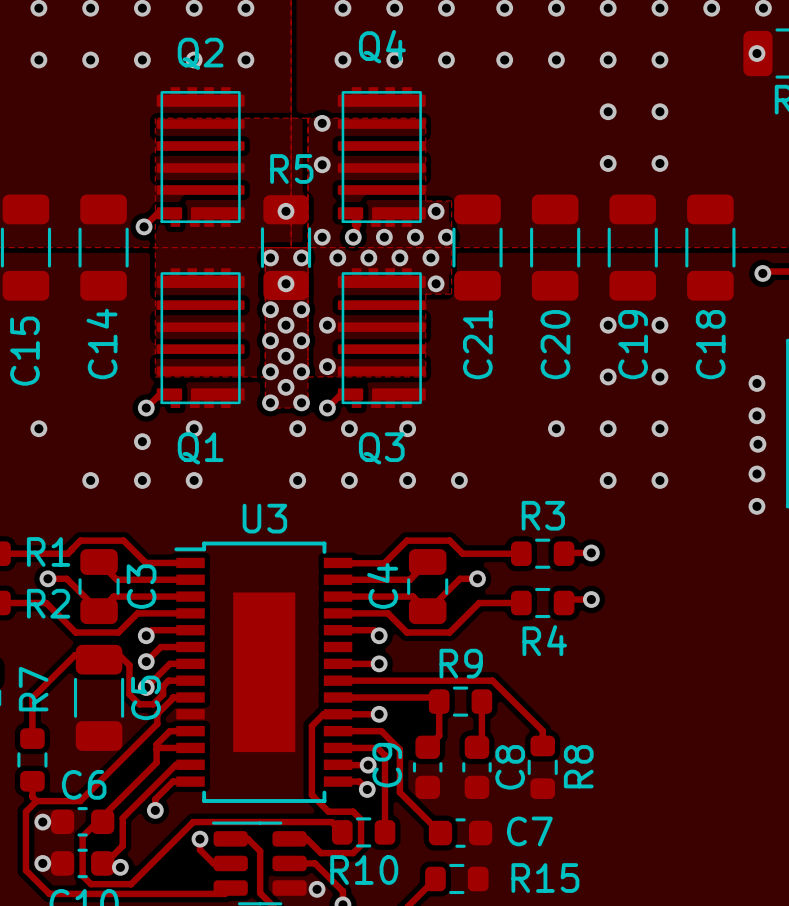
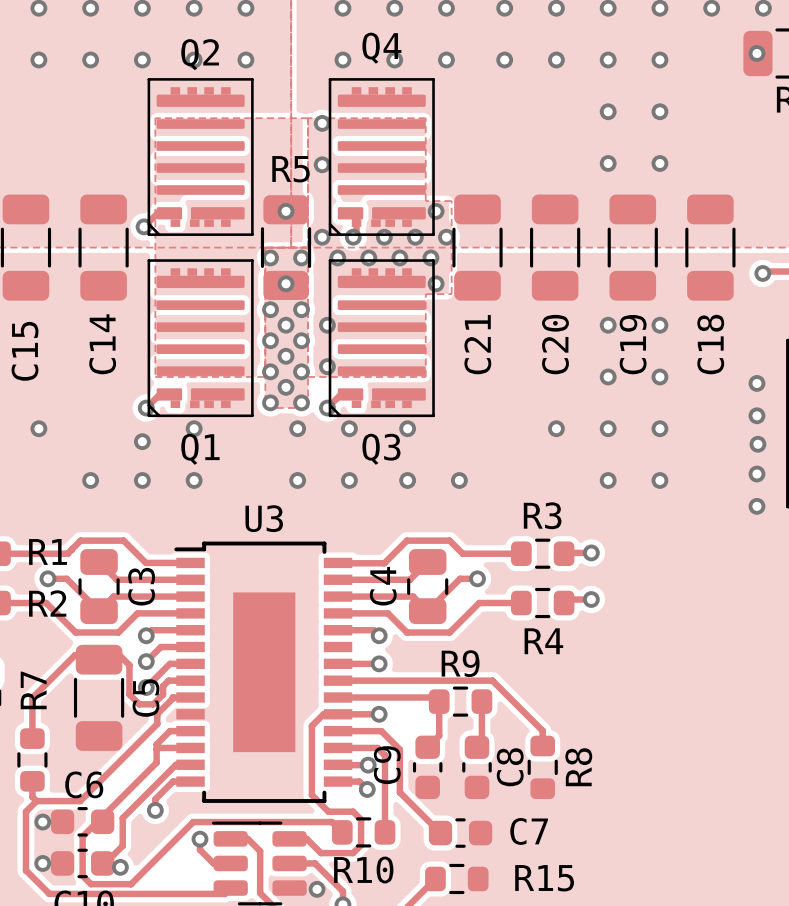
Q2 footprint: [156, 87, 245, 227] -> [147, 78, 254, 236]
Q4 footprint: [337, 87, 426, 227] -> [328, 78, 435, 236]
Q1 footprint: [156, 268, 245, 409] -> [147, 259, 254, 418]
Q3 footprint: [337, 268, 426, 409] -> [328, 259, 435, 418]

